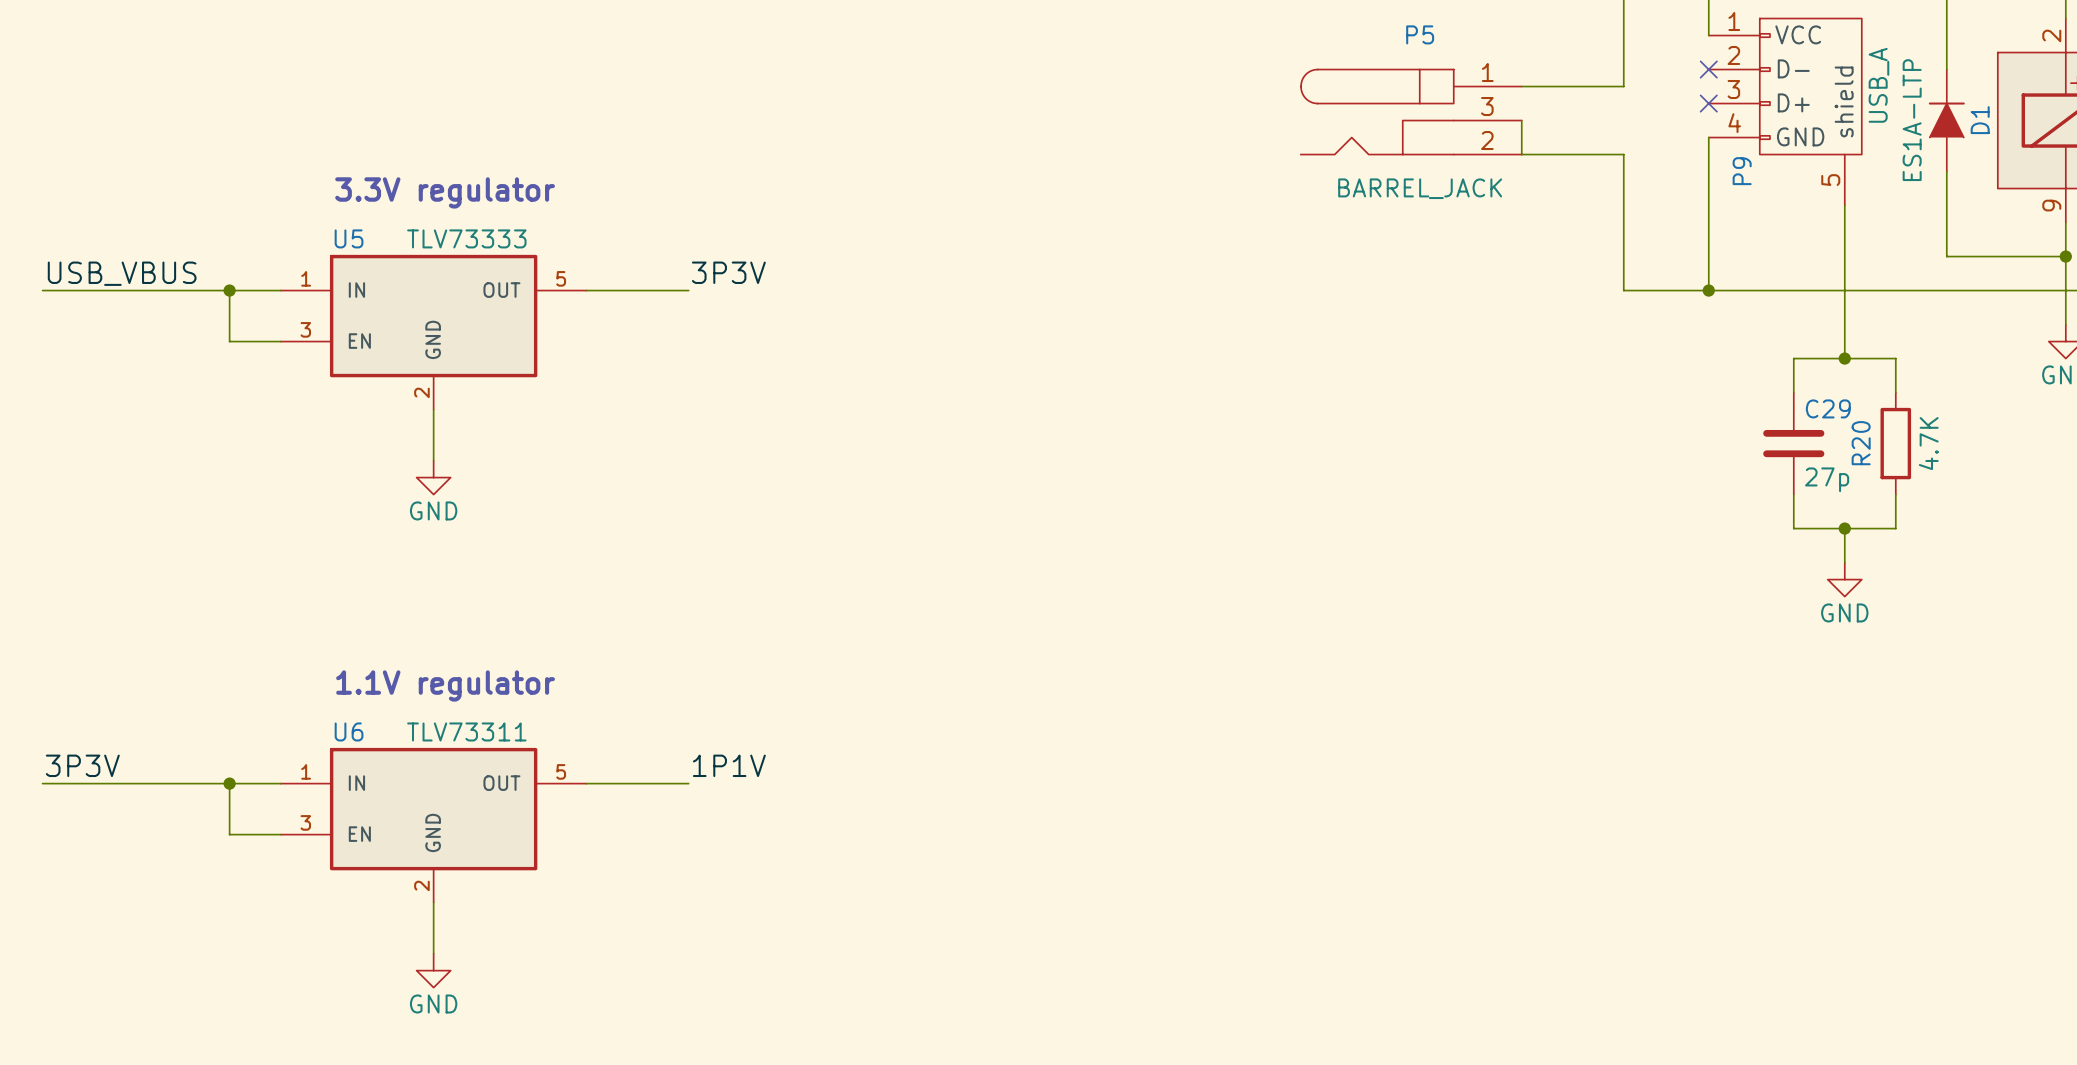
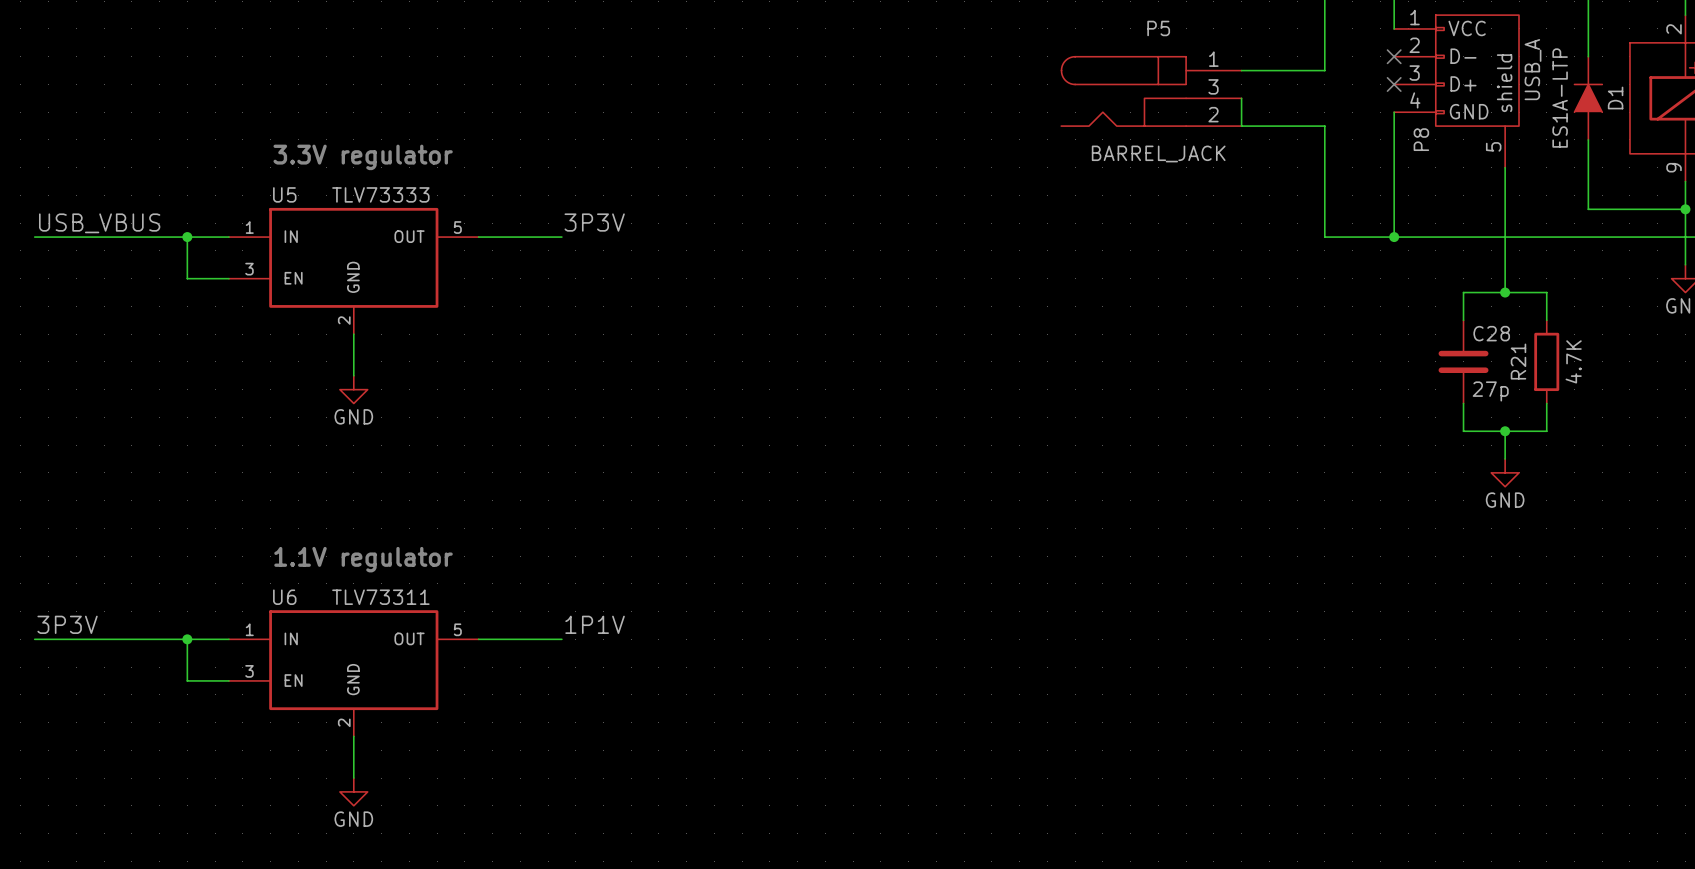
P9 name: P9 (1742, 171) -> P8 (1421, 139)
C29 name: C29 (1828, 408) -> C28 (1491, 333)
R20 name: R20 (1861, 443) -> R21 (1518, 361)

